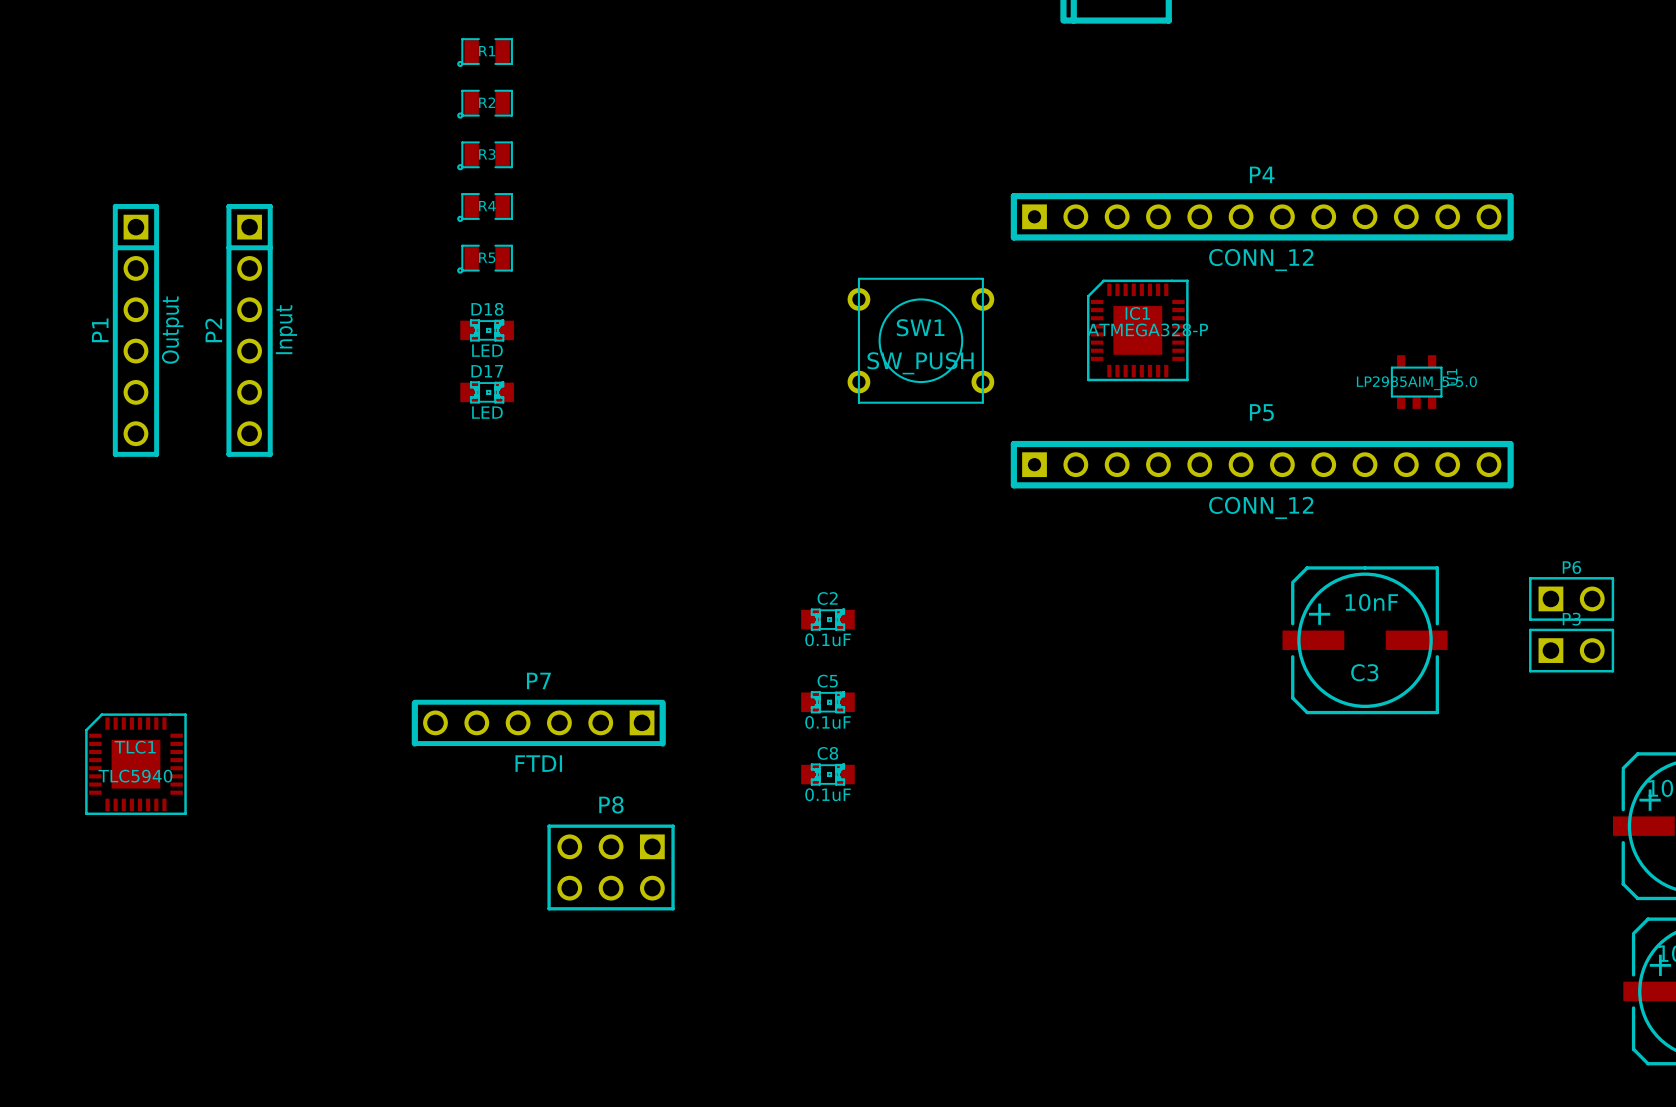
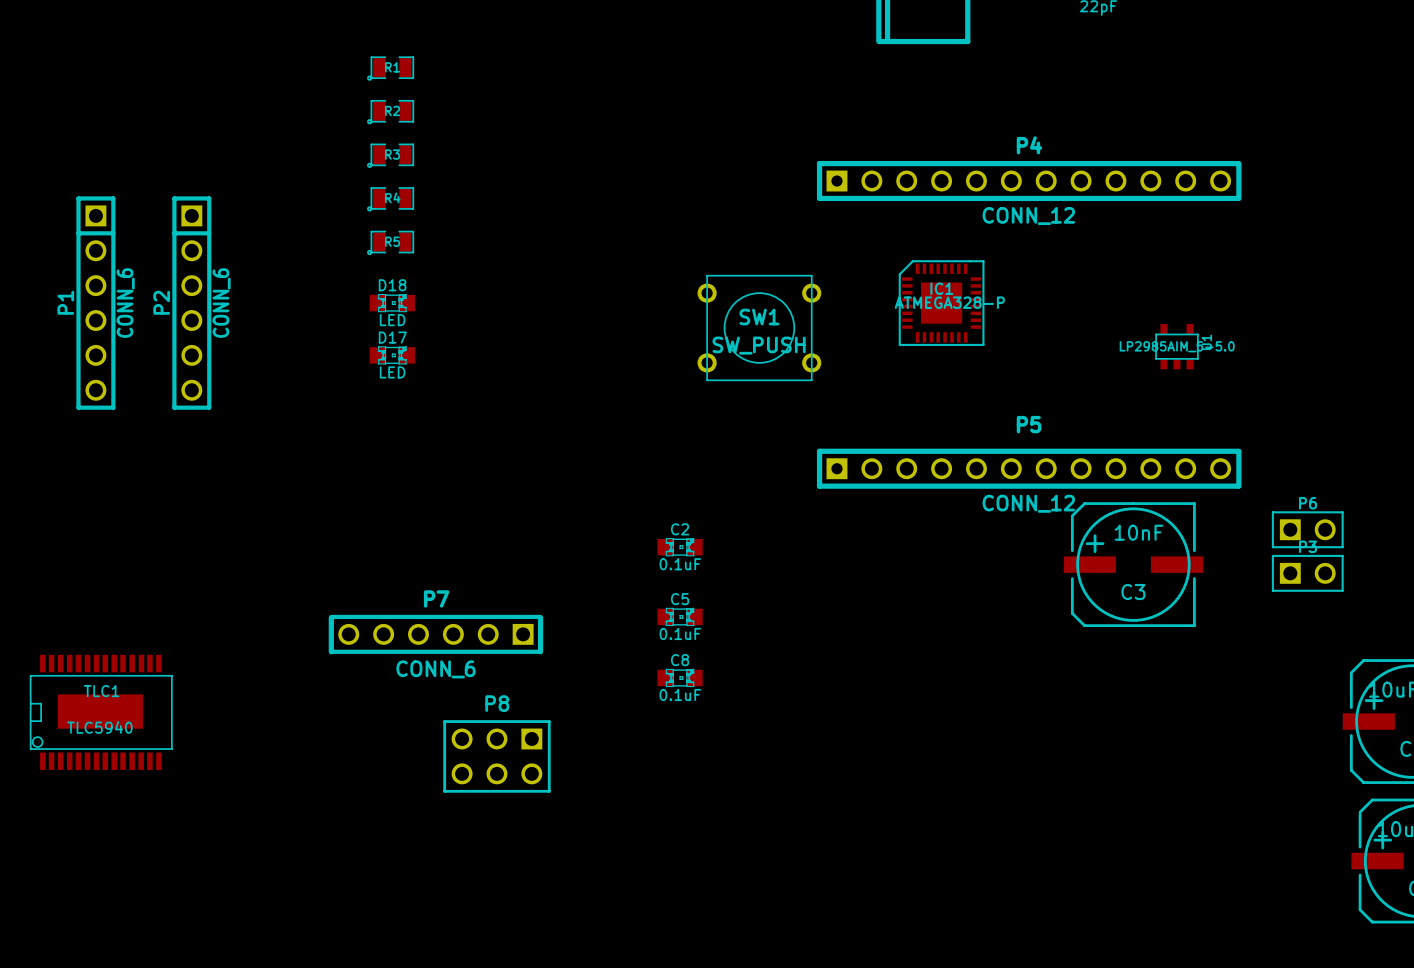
P4 position: (1262, 216) -> (1029, 181)
P2 value: Input (286, 329) -> CONN_6 (221, 303)
P1 value: Output (172, 330) -> CONN_6 (125, 303)
SW1 position: (920, 340) -> (759, 328)
P5 position: (1262, 464) -> (1029, 468)
TLC1 footprint: [85, 713, 187, 816] -> [29, 654, 173, 770]
P7 value: FTDI (538, 763) -> CONN_6 (435, 669)

